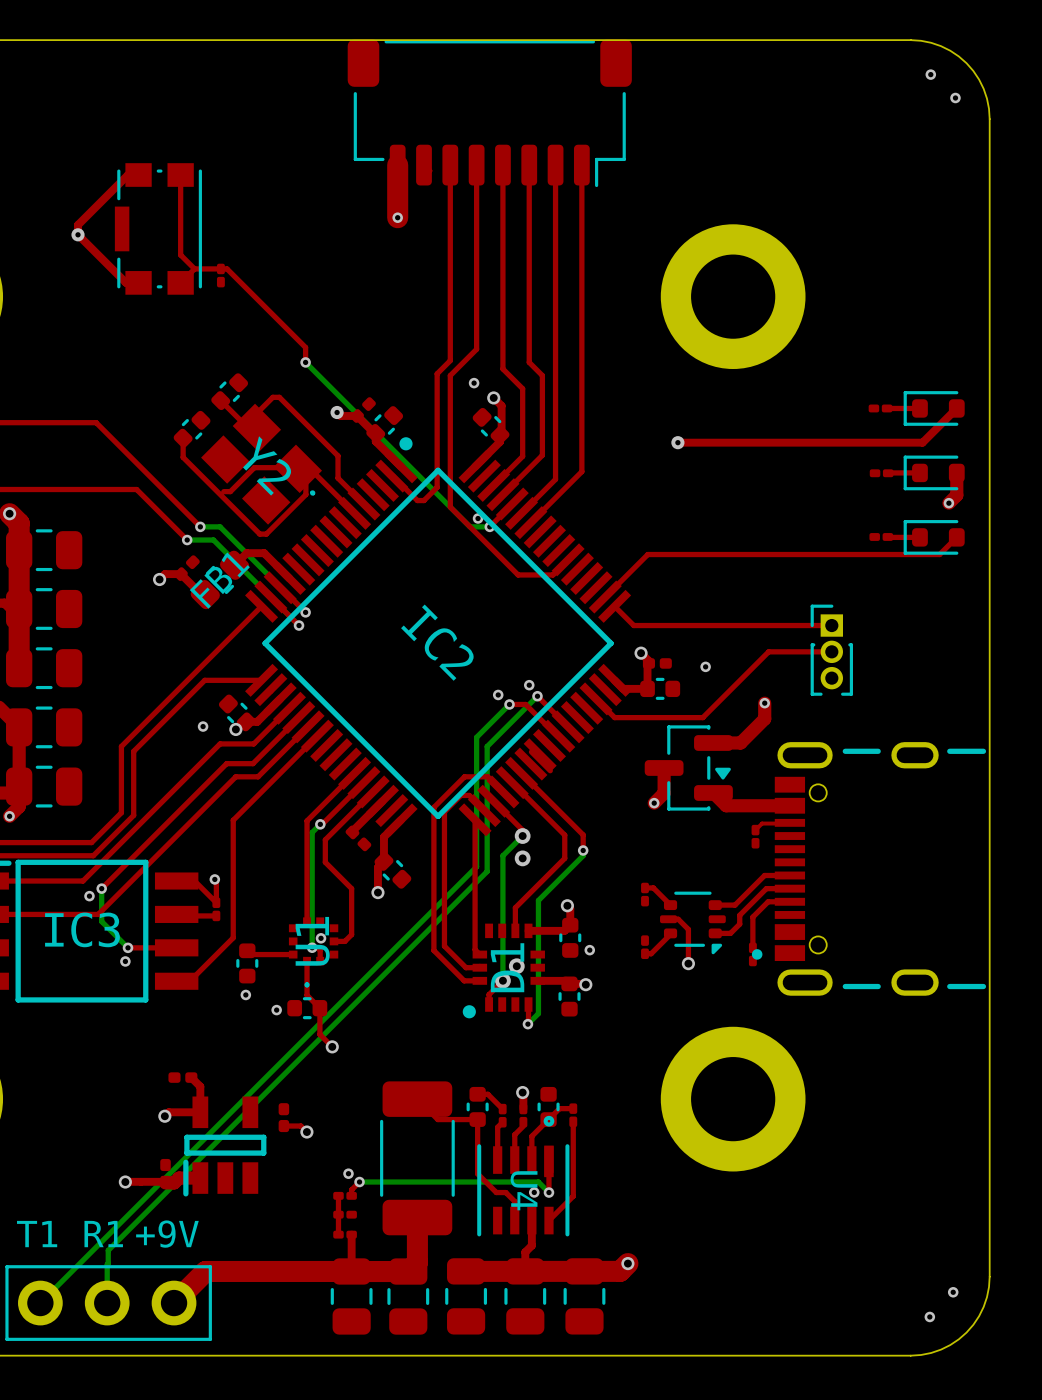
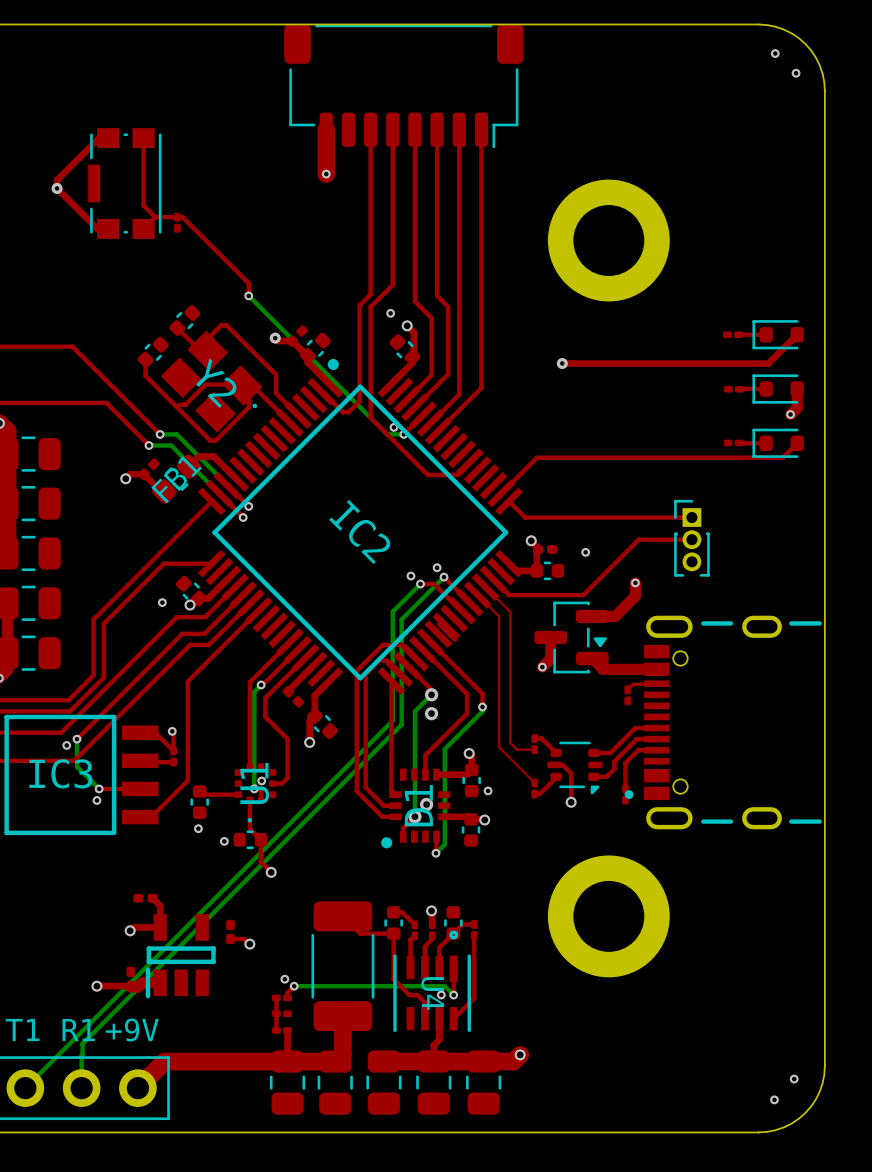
top track: none -> (485, 587) (510, 611) (510, 742) (517, 749) (534, 749)
top track: none -> (477, 595) (499, 616) (499, 747) (534, 782)

